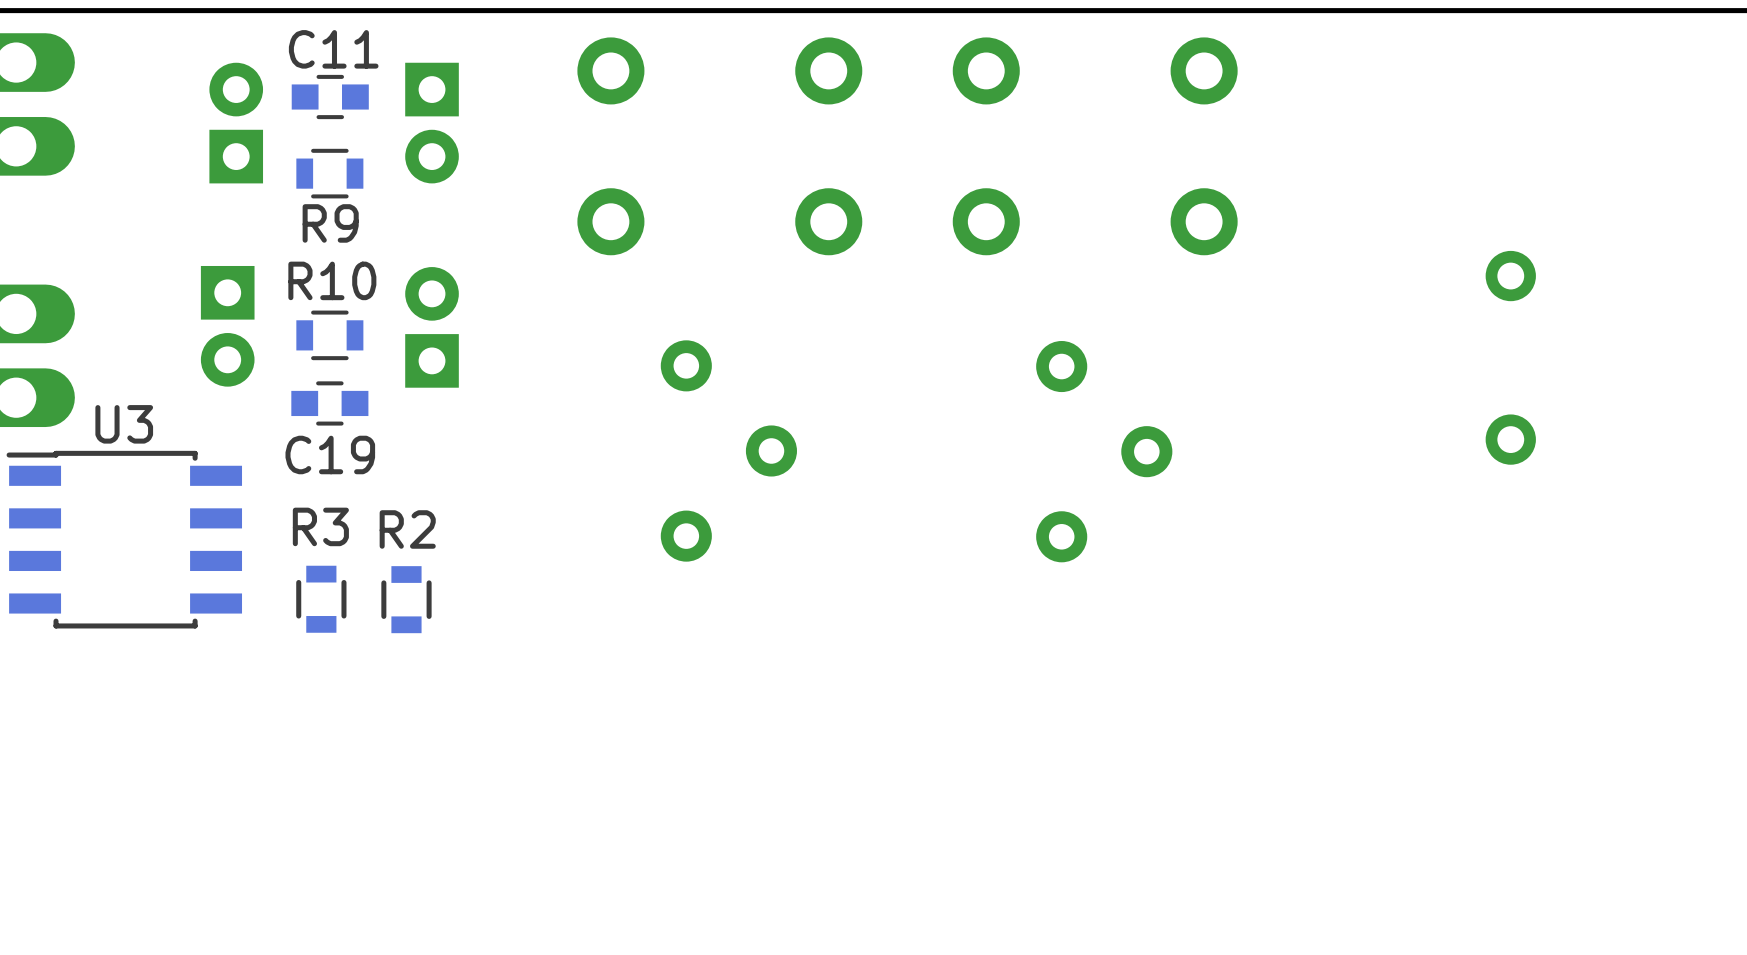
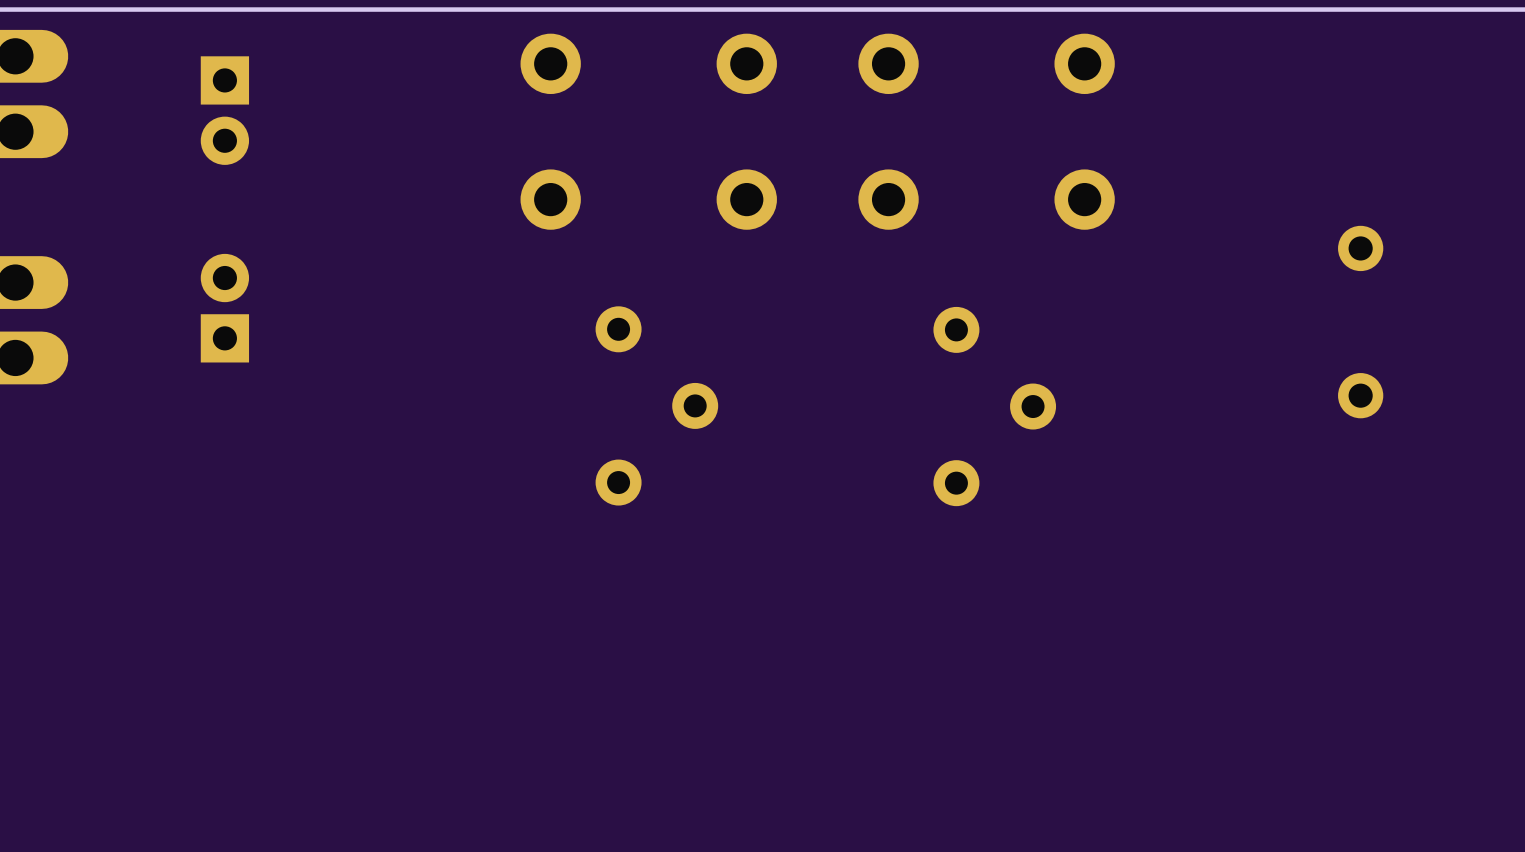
C11: (330, 97) -> none
part rotation: 0° (236, 123) -> 180° (224, 110)
part: (432, 123) -> none
R9: (329, 173) -> none
part rotation: 0° (227, 326) -> 180° (224, 308)
part: (432, 327) -> none
R10: (329, 335) -> none
C19: (329, 403) -> none
U3: (124, 539) -> none
R3: (321, 599) -> none
R2: (406, 599) -> none

